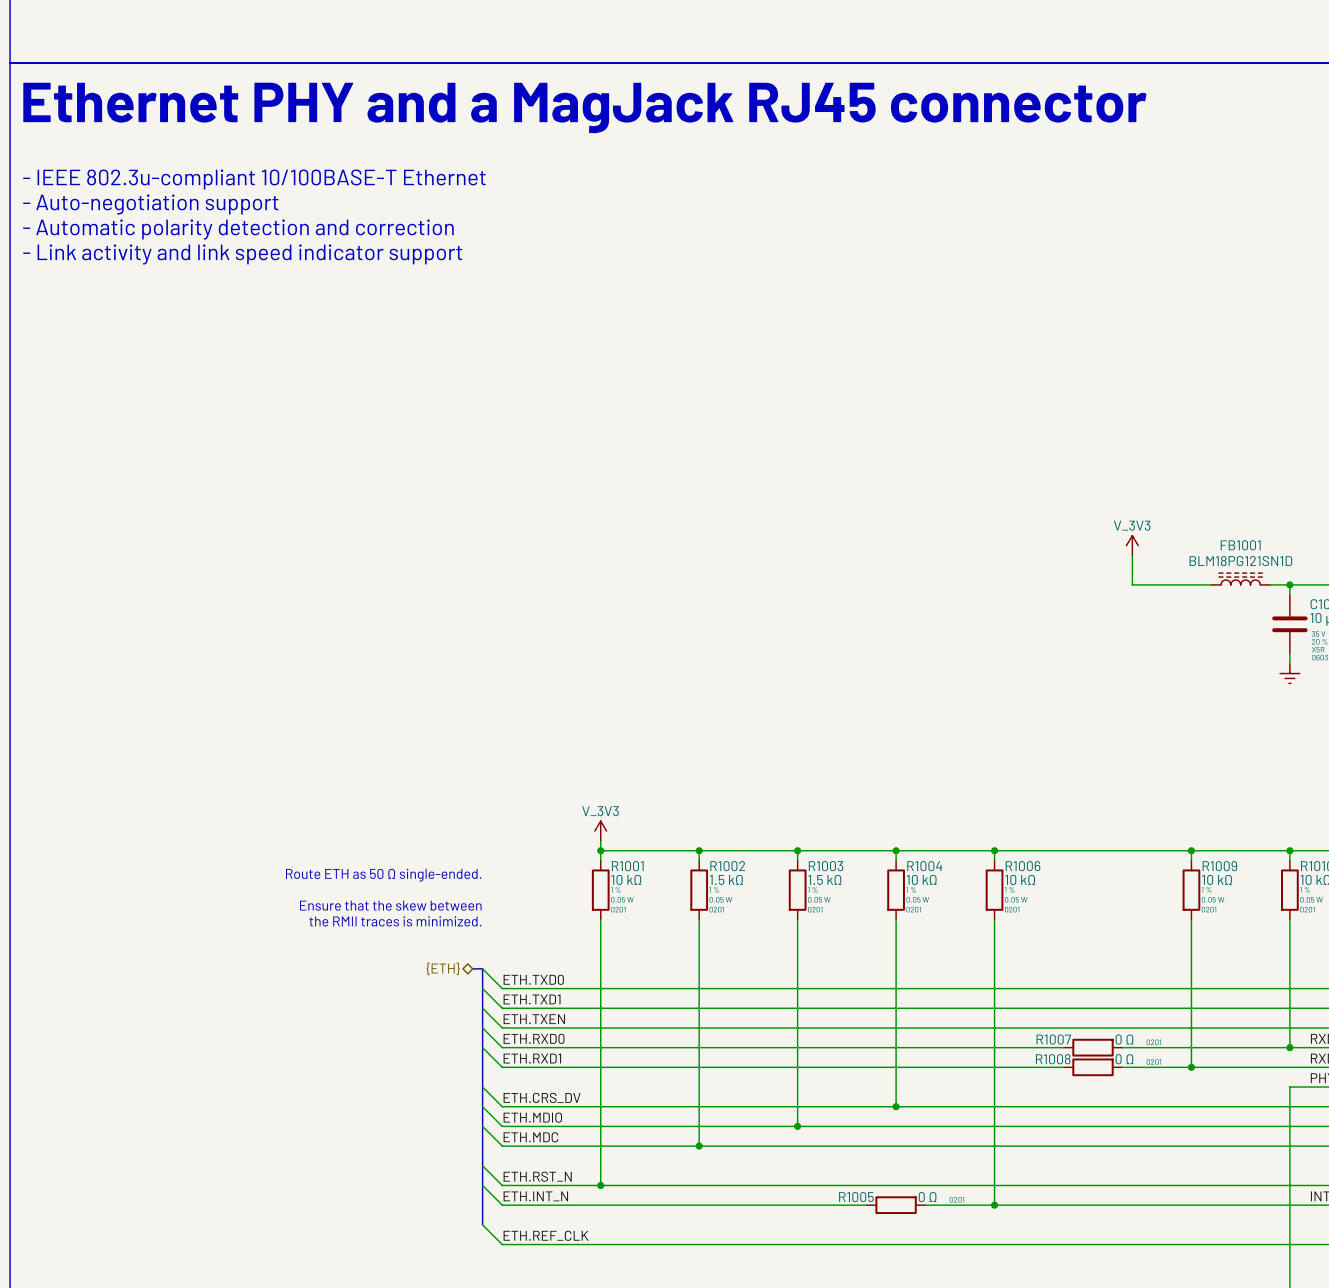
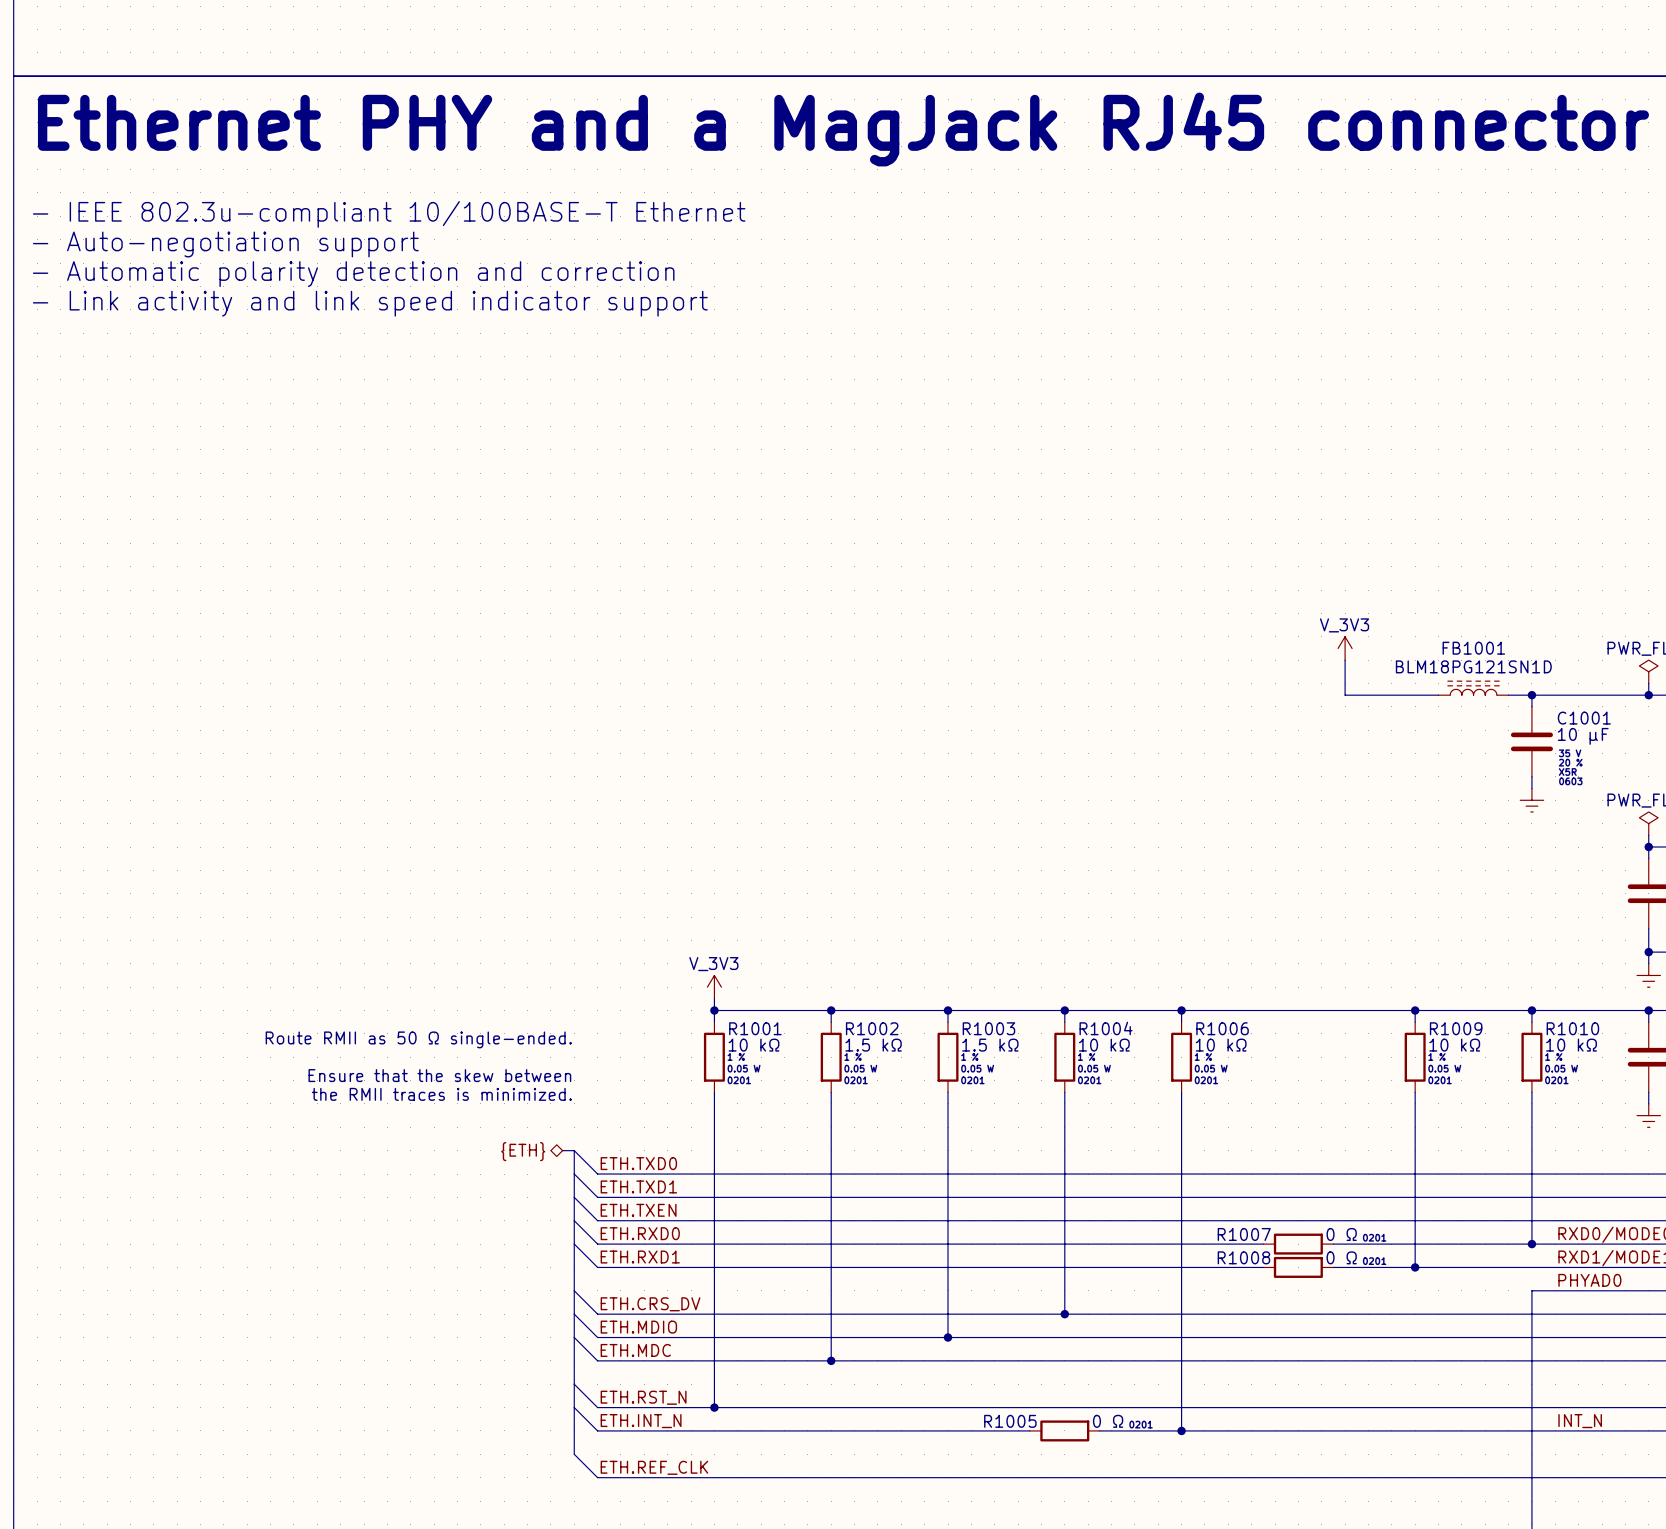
text: Route ETH as 50 Ω single-ended. (383, 875) -> Route RMII as 50 Ω single-ended. (418, 1039)

